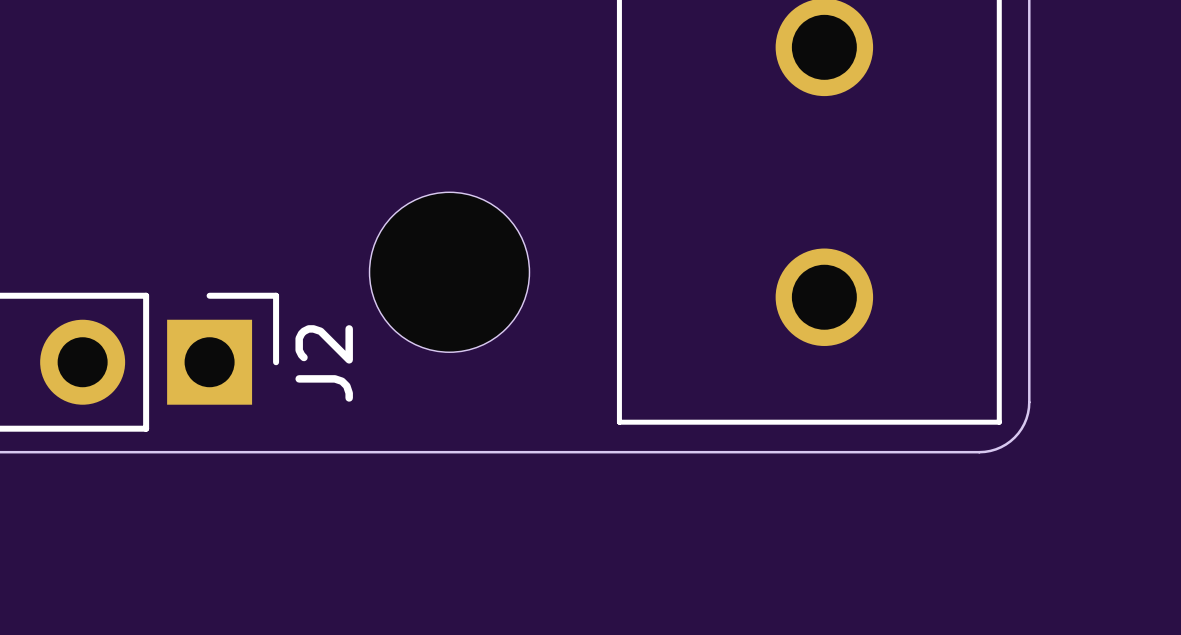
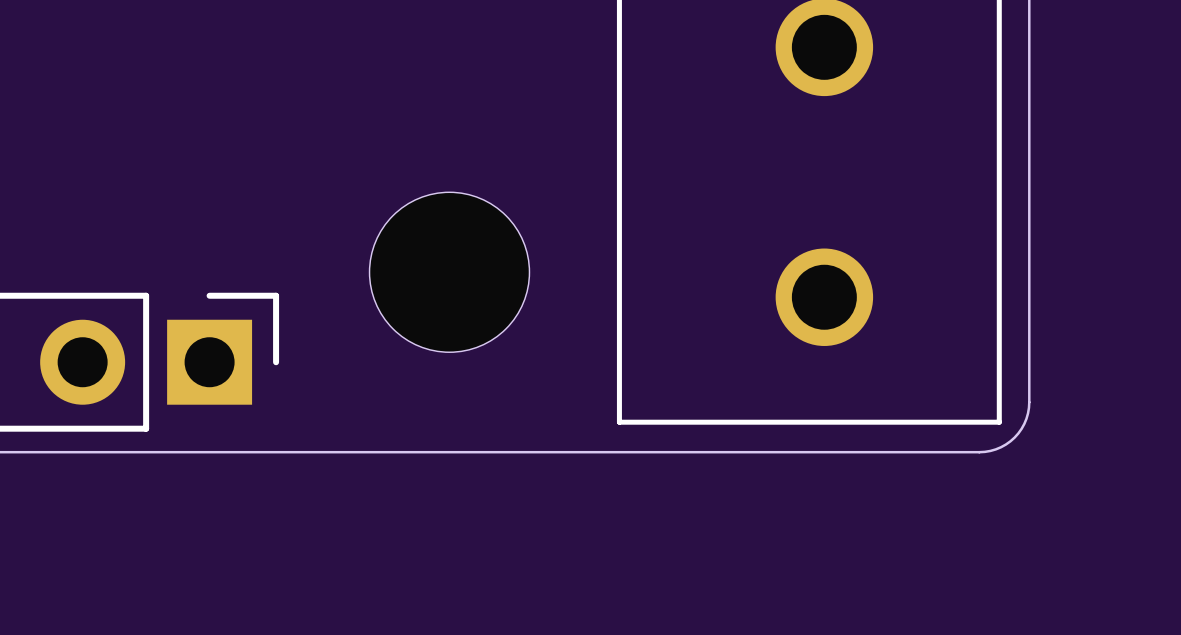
J2 name: J2 (324, 363) -> none

